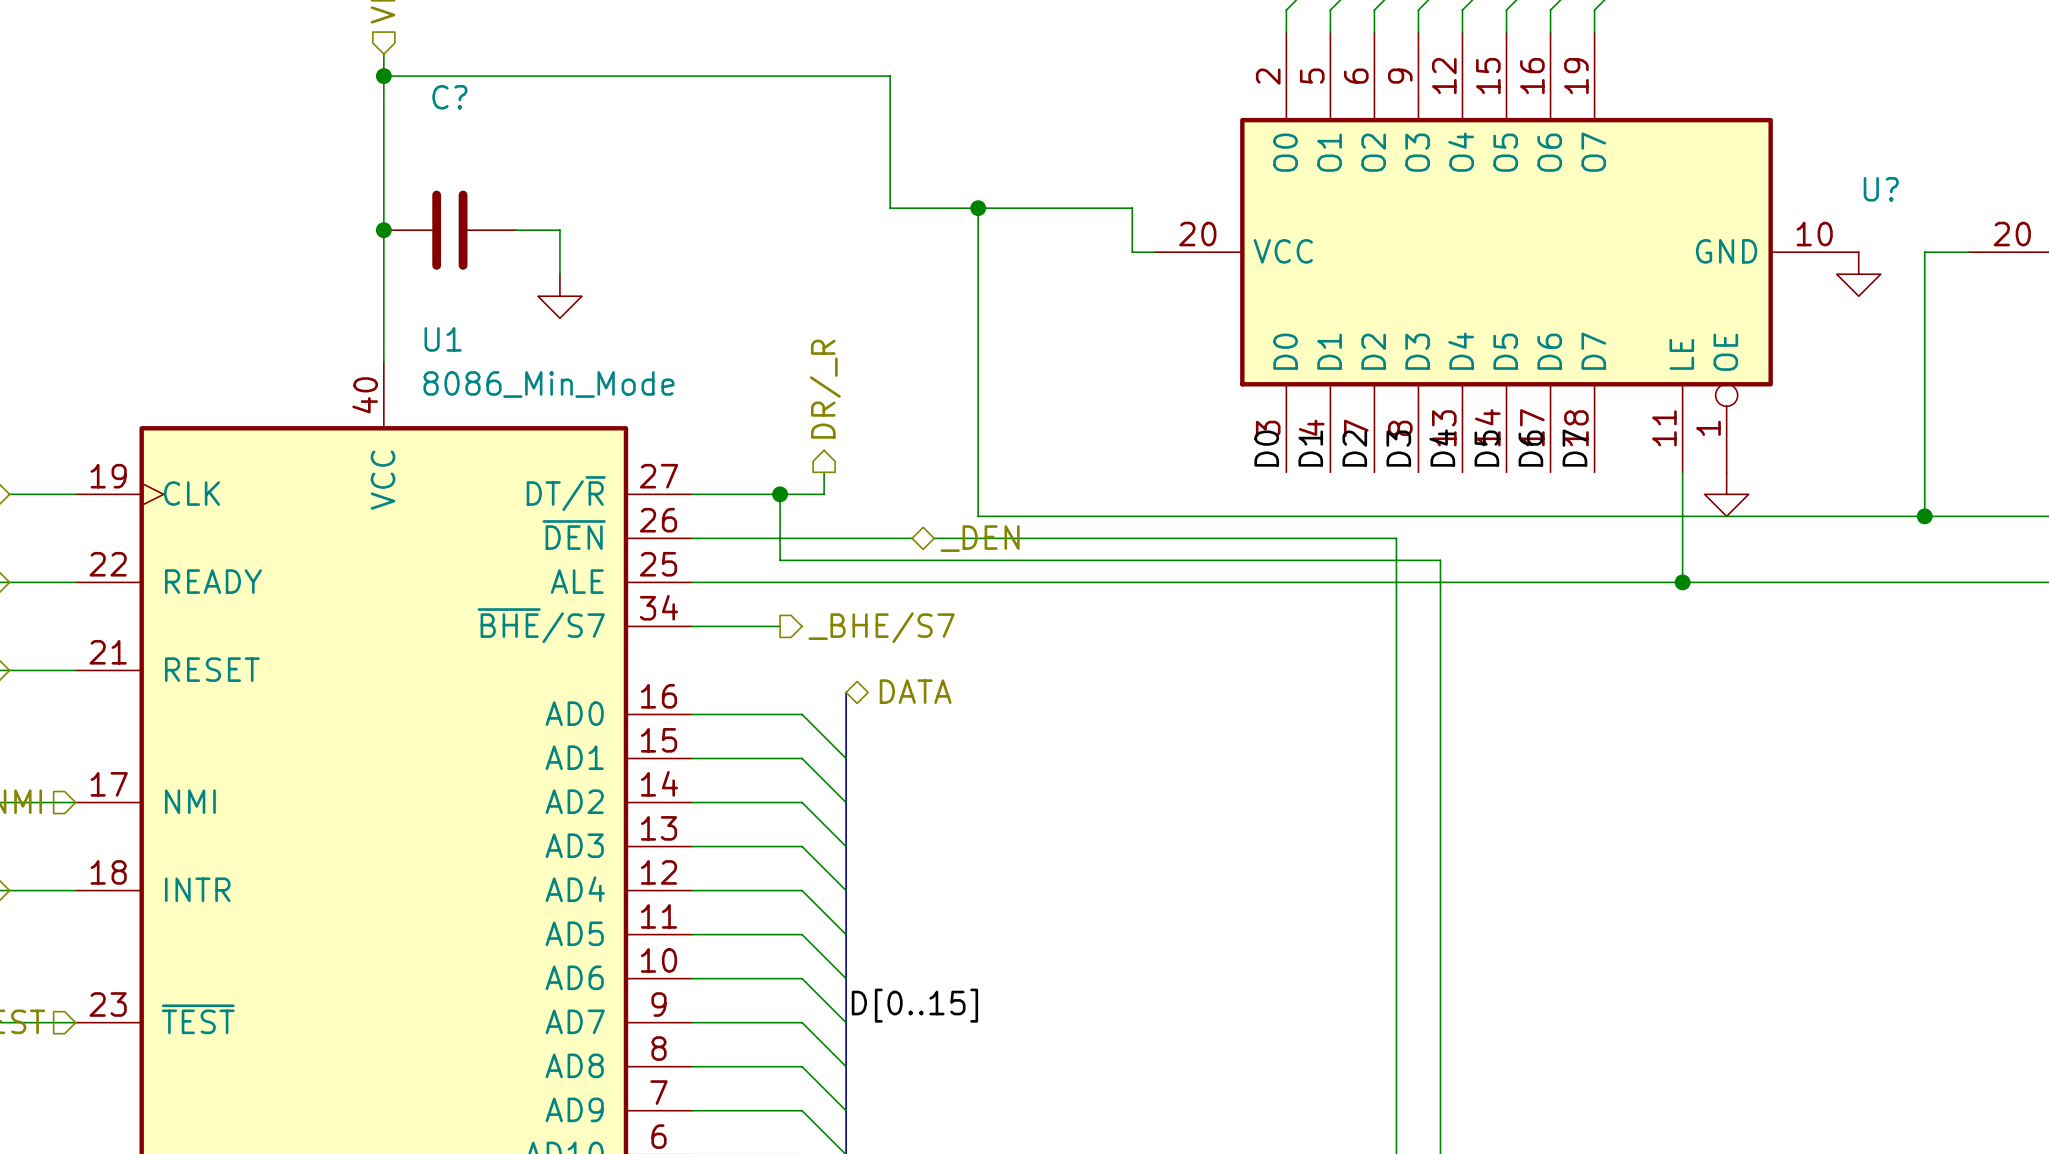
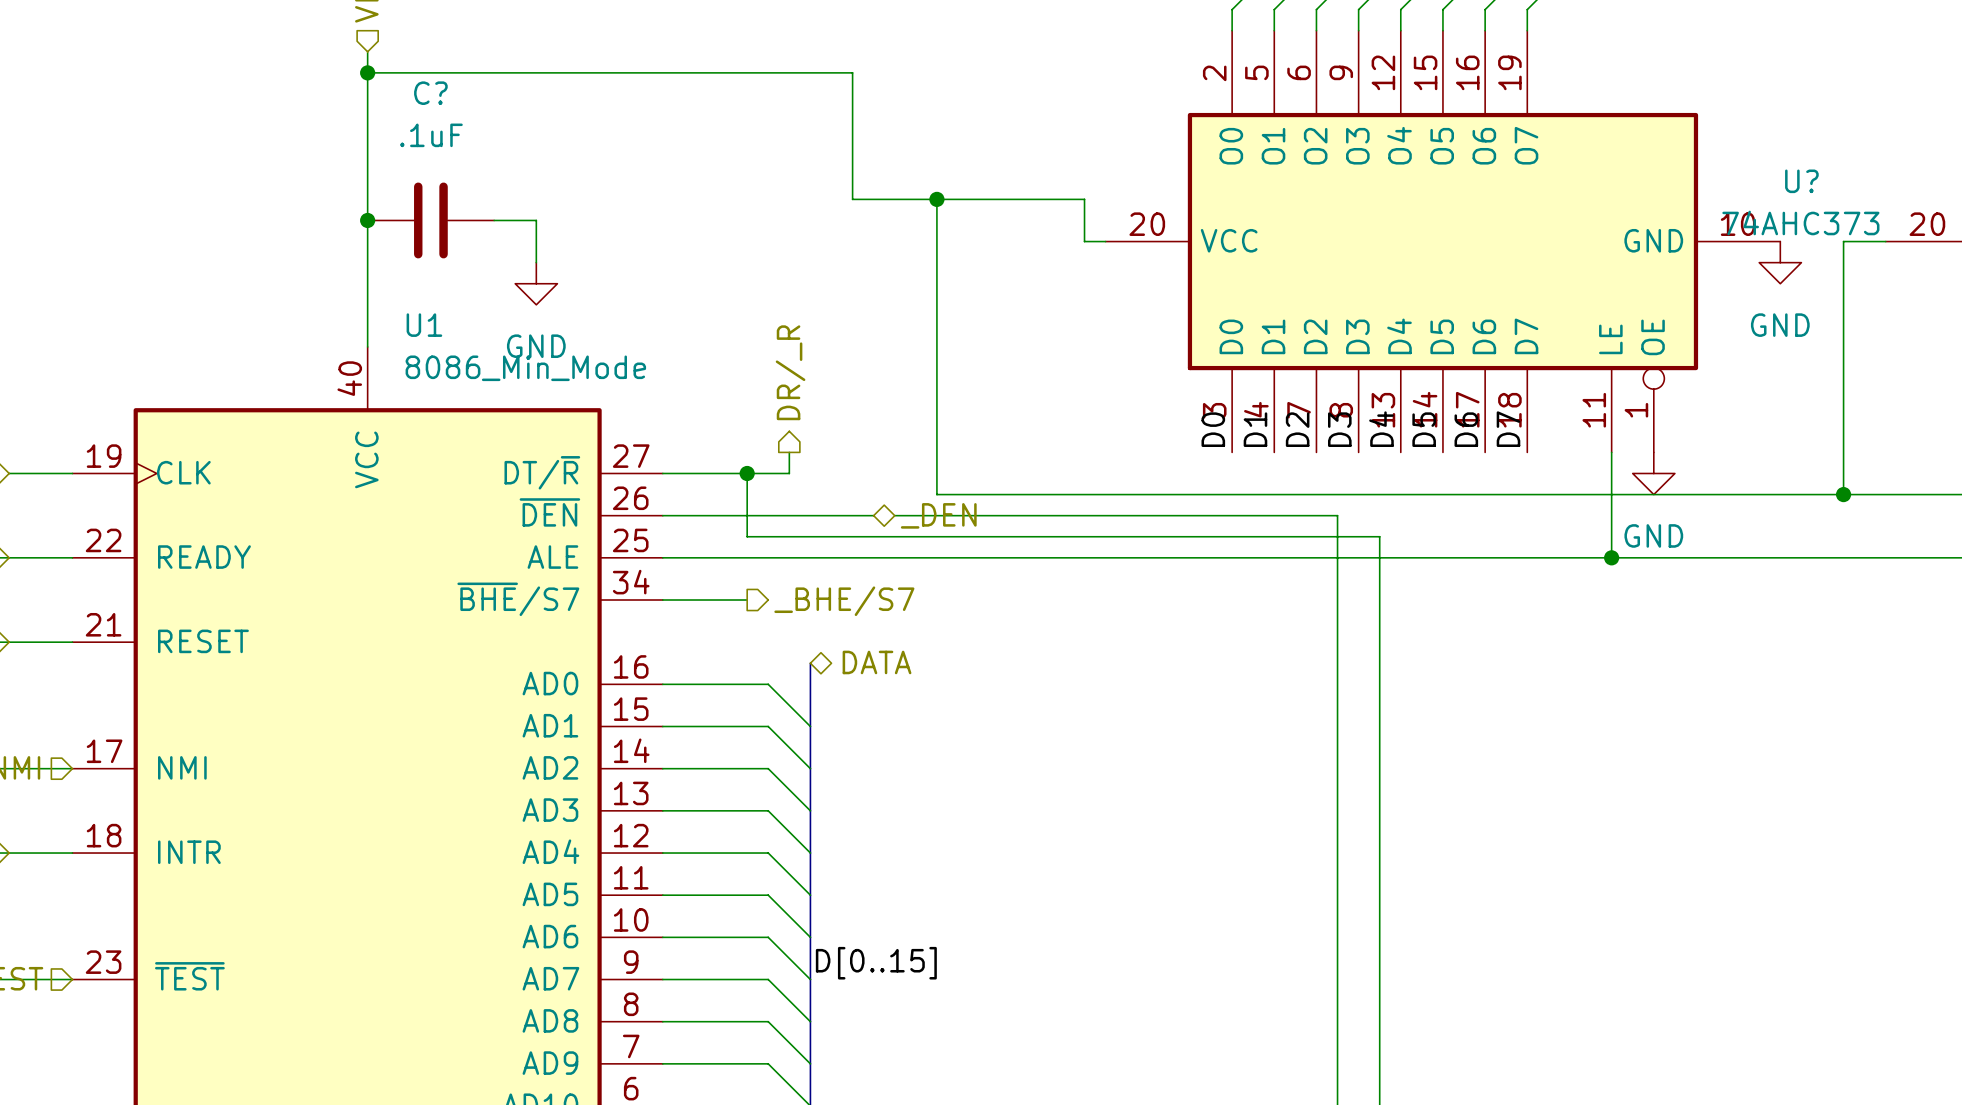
C? value: none -> .1uF (431, 135)
U? value: none -> 74AHC373 (1800, 222)
power symbol text: none -> GND (1780, 325)
power symbol text: none -> GND (536, 346)
power symbol text: none -> GND (1653, 535)

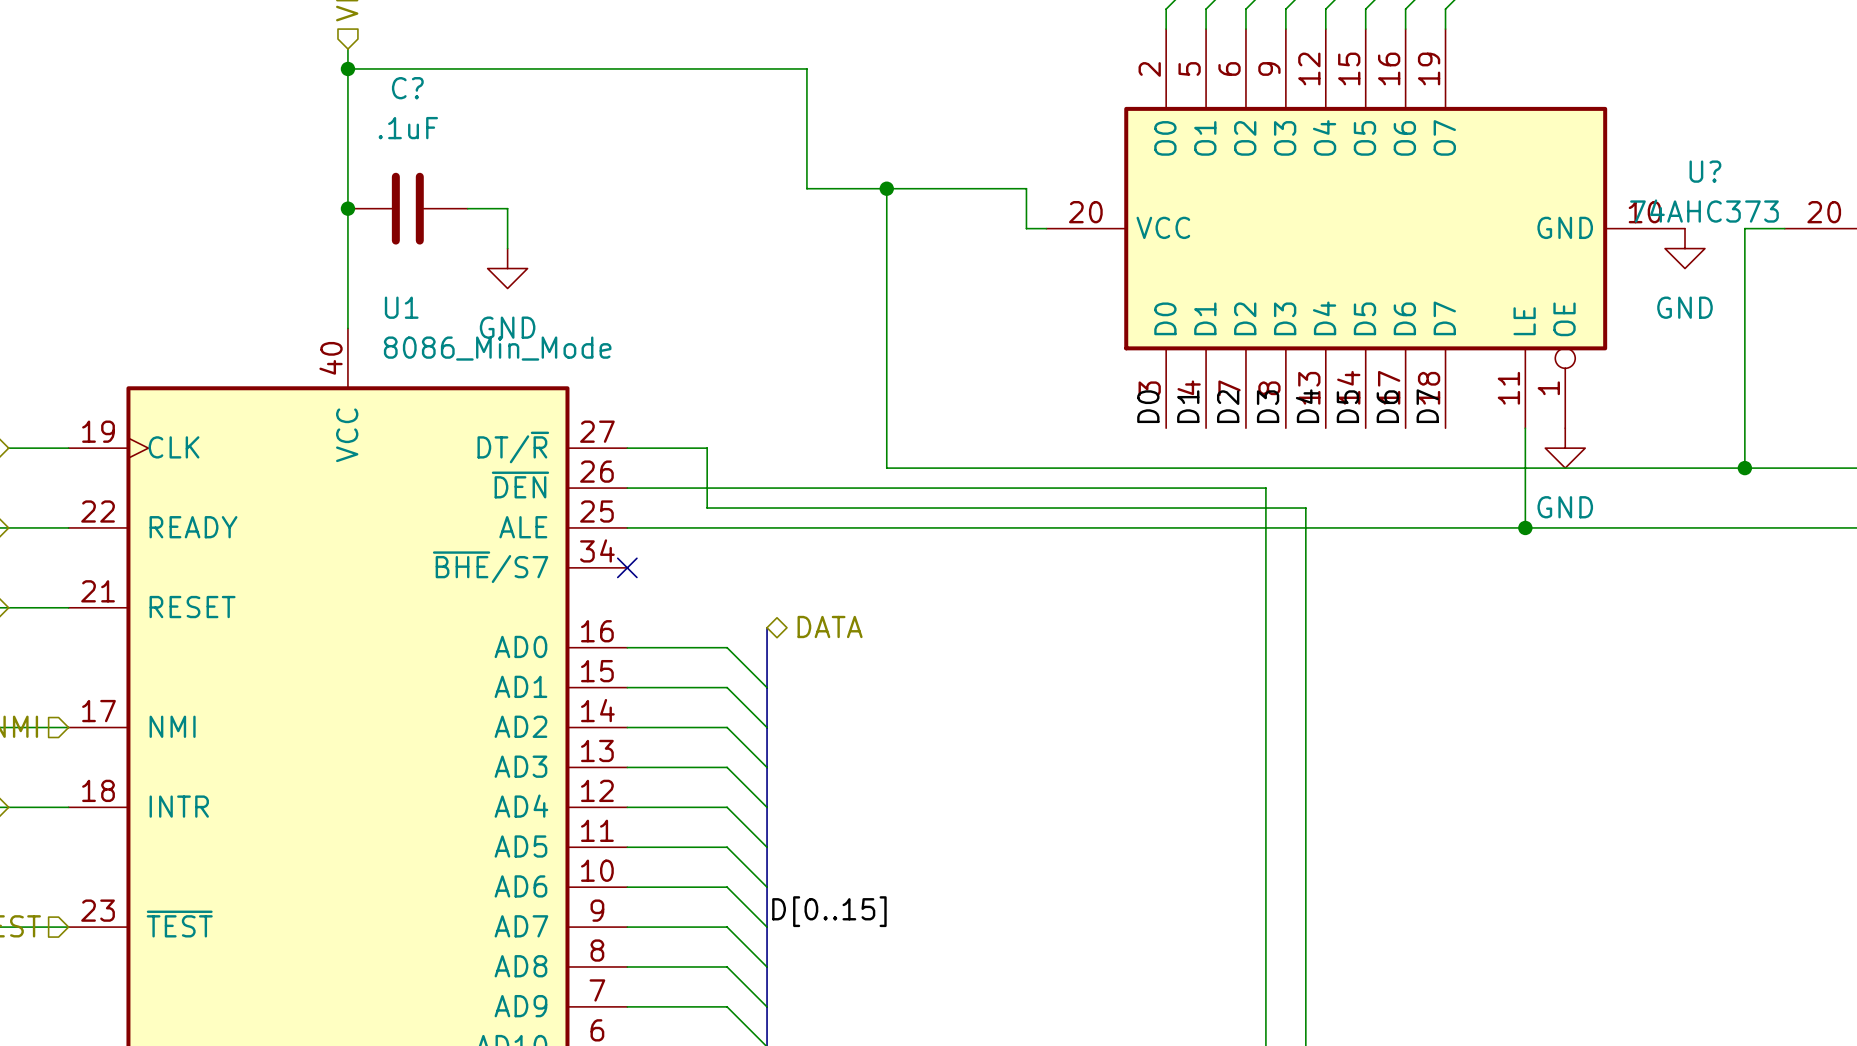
hierarchical label: DR/_R (790, 372) -> none
wire: (789, 452) (789, 473) (747, 473) -> none
junction: (747, 473) -> none
wire: none -> (826, 488) (846, 488)
hierarchical label: _DEN (938, 515) -> none
wire: (662, 600) (747, 600) -> none
no-connect mark: none -> (627, 567)
hierarchical label: _BHE/S7 (844, 601) -> none

